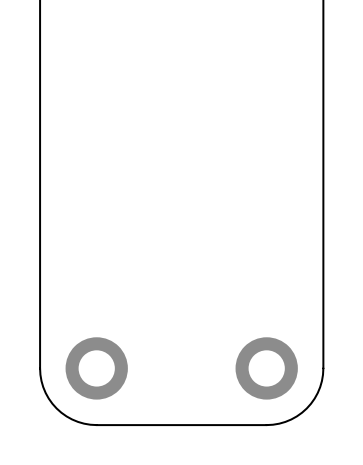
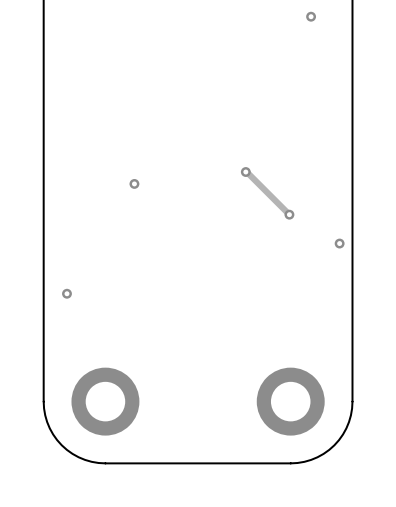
via: none -> (311, 16)
track: none -> (245, 172) (289, 214)
via: none -> (245, 172)
via: none -> (134, 183)
via: none -> (289, 214)
via: none -> (339, 243)
via: none -> (66, 293)

